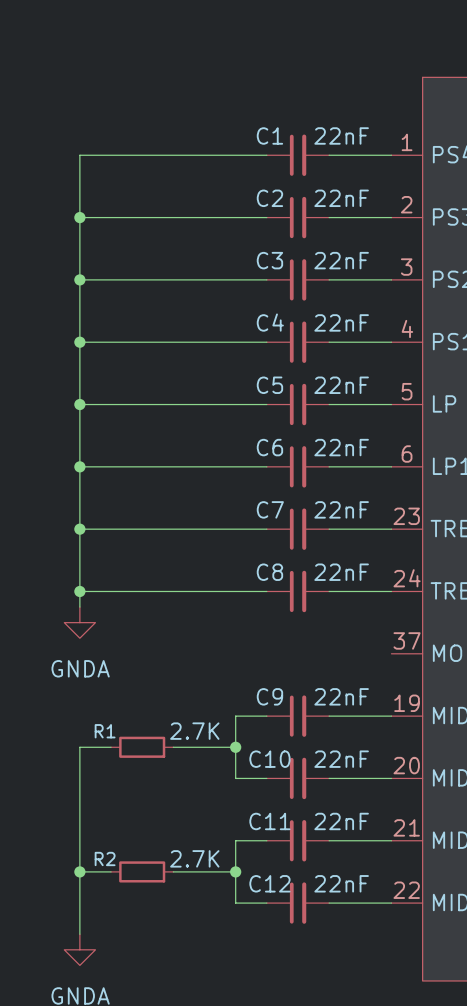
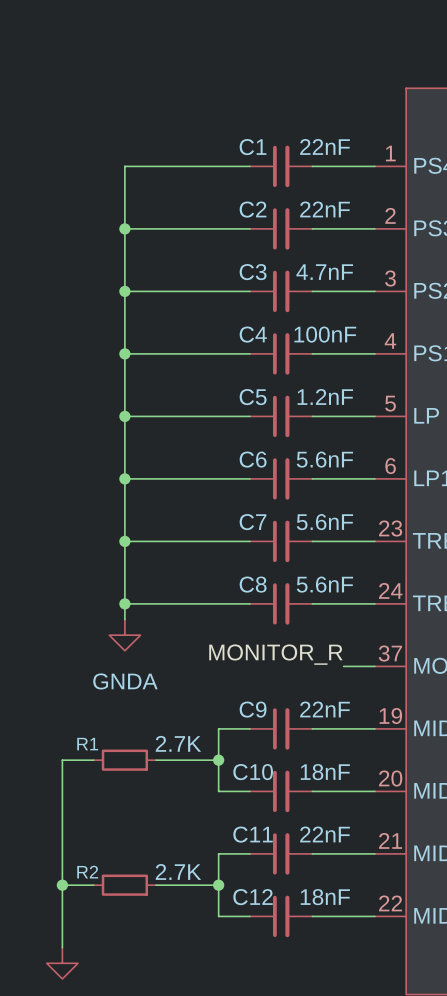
wire: (142, 155) (79, 155) (79, 607) -> (124, 166) (124, 619)
wire: (79, 217) (142, 217) -> none
junction: (79, 217) -> none
junction: none -> (124, 228)
C3 value: 22nF (341, 260) -> 4.7nF (324, 272)
wire: (79, 279) (142, 279) -> none
junction: (79, 279) -> none
junction: none -> (124, 291)
C4 value: 22nF (341, 322) -> 100nF (325, 334)
wire: (79, 342) (142, 342) -> none
junction: (79, 342) -> none
junction: none -> (124, 353)
C5 value: 22nF (341, 385) -> 1.2nF (325, 396)
wire: (79, 404) (142, 404) -> none
junction: (79, 404) -> none
junction: none -> (124, 416)
C6 value: 22nF (341, 447) -> 5.6nF (324, 459)
wire: (79, 466) (142, 466) -> none
junction: (79, 466) -> none
junction: none -> (124, 478)
C7 value: 22nF (341, 509) -> 5.6nF (324, 522)
wire: (79, 529) (142, 529) -> none
junction: (79, 529) -> none
junction: none -> (124, 541)
C8 value: 22nF (341, 572) -> 5.6nF (324, 584)
wire: (79, 591) (142, 591) -> none
junction: (79, 591) -> none
junction: none -> (124, 603)
power symbol position: GNDA (79, 622) -> GNDA (124, 635)
label: none -> MONITOR_R (275, 654)
wire: none -> (343, 666) (374, 666)
C10 value: 22nF (341, 759) -> 18nF (325, 772)
C12 value: 22nF (341, 883) -> 18nF (325, 897)

